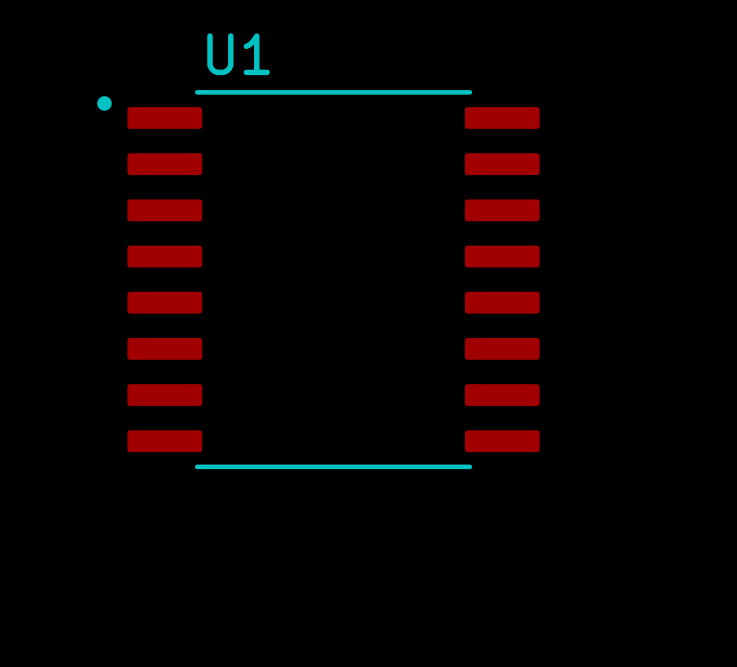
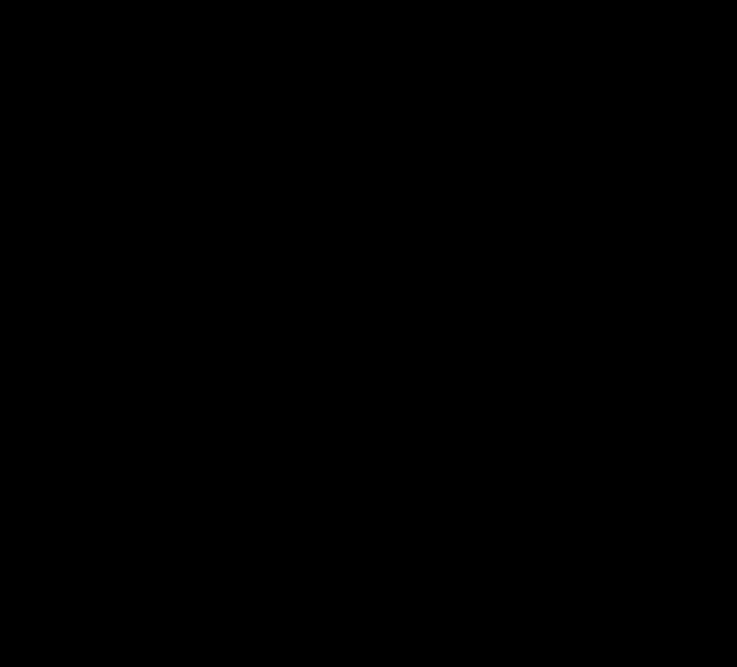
U1: (318, 279) -> none

